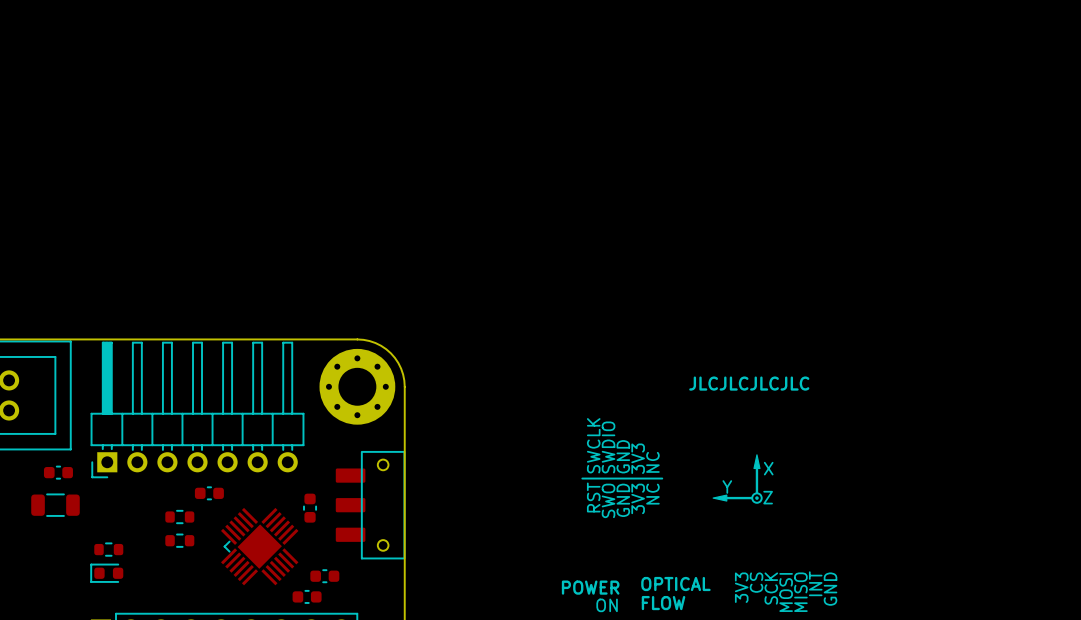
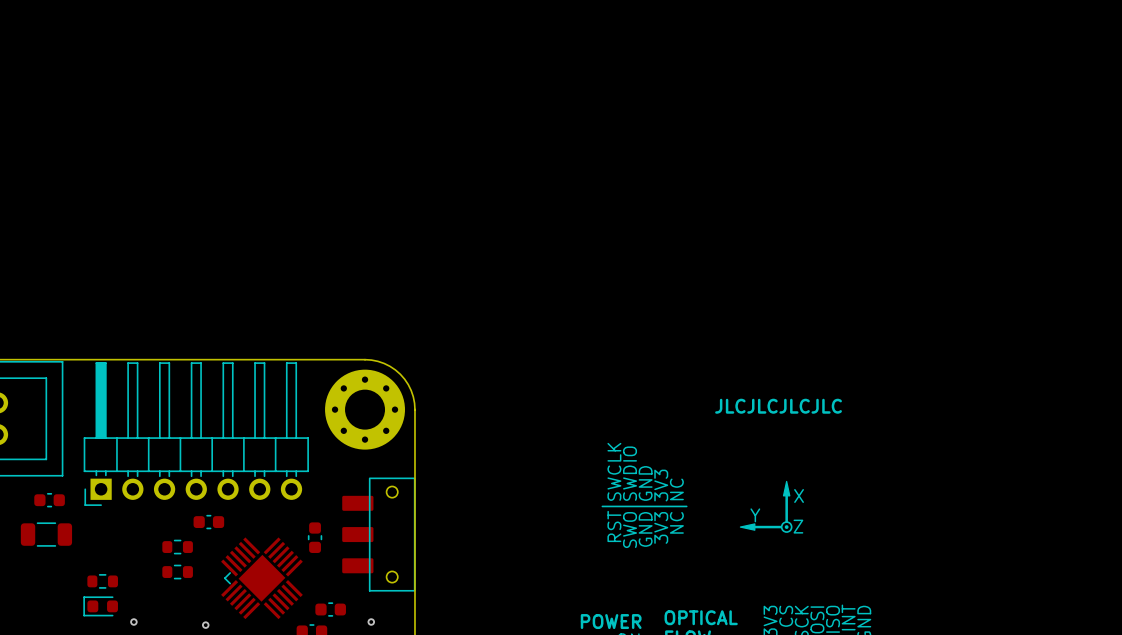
via: none -> (133, 622)
via: none -> (371, 622)
via: none -> (205, 625)

